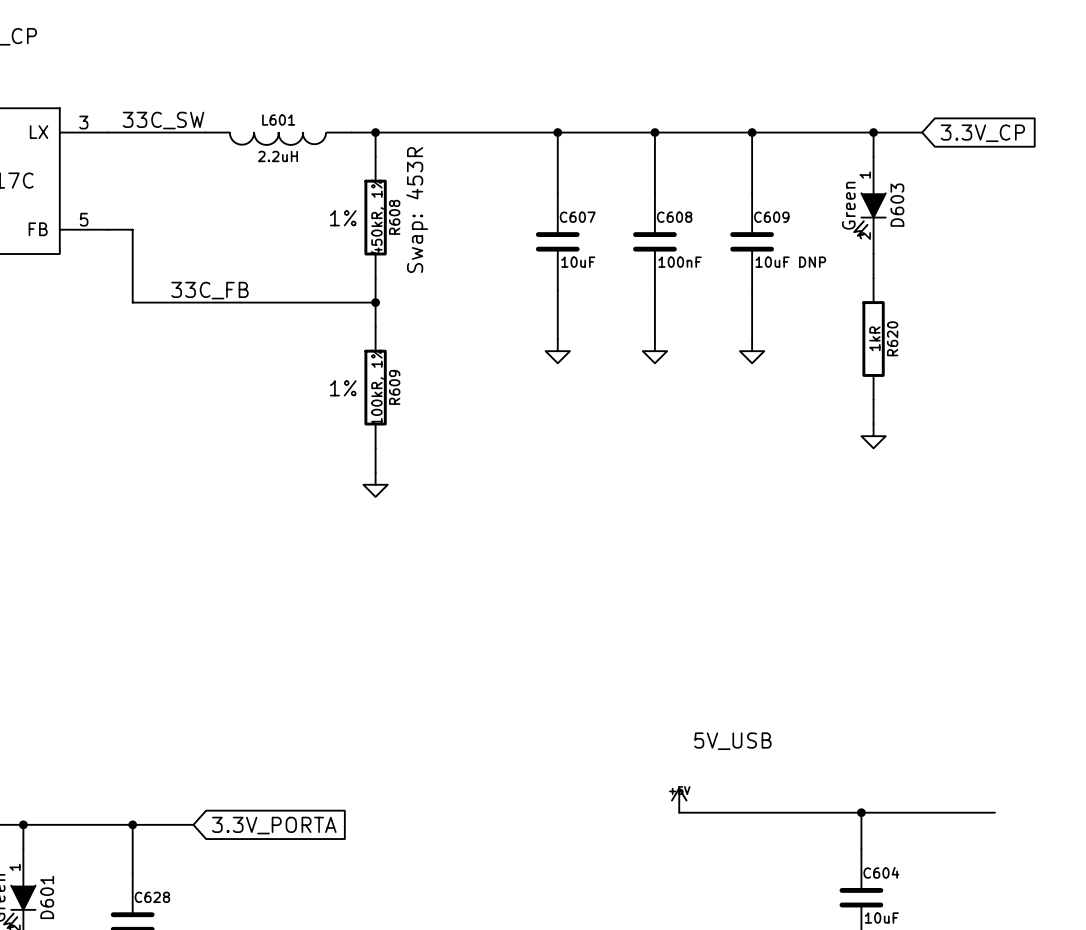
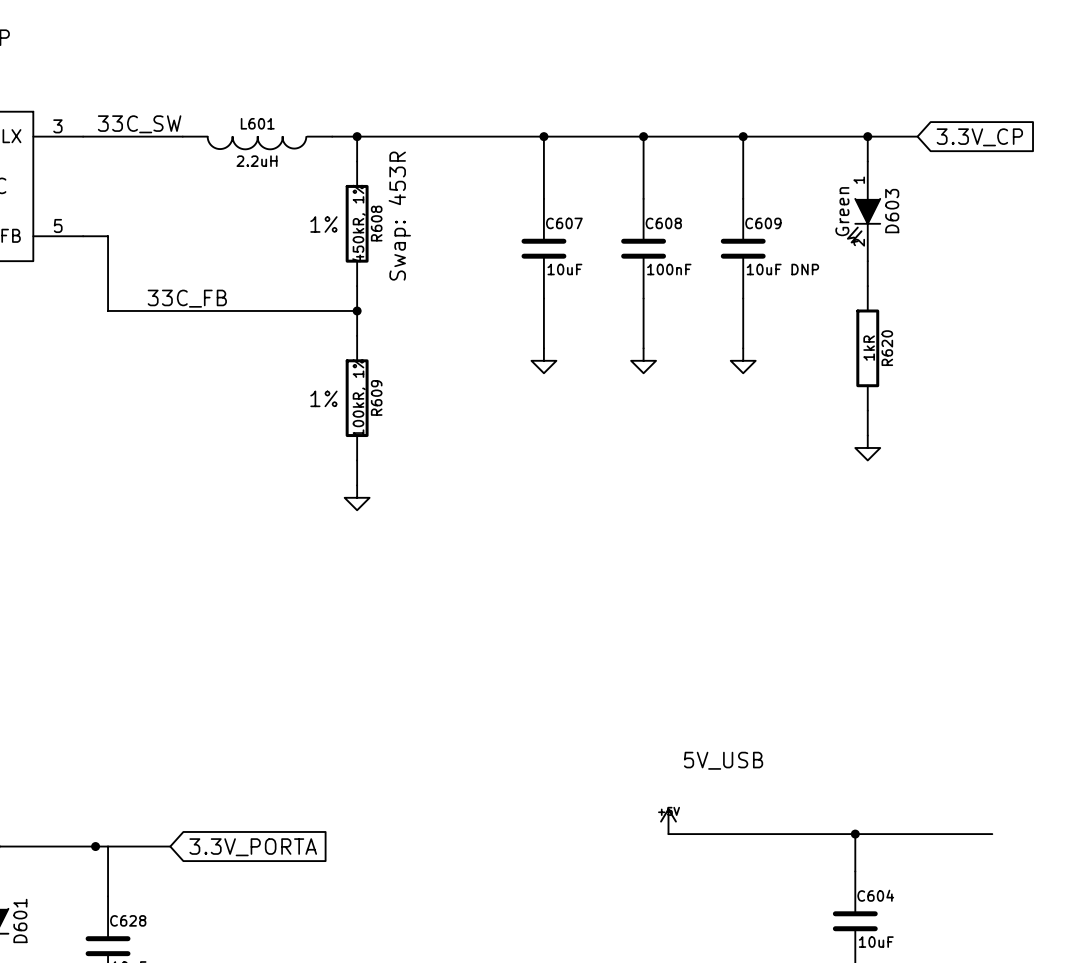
junction position: (132, 824) -> (95, 846)

